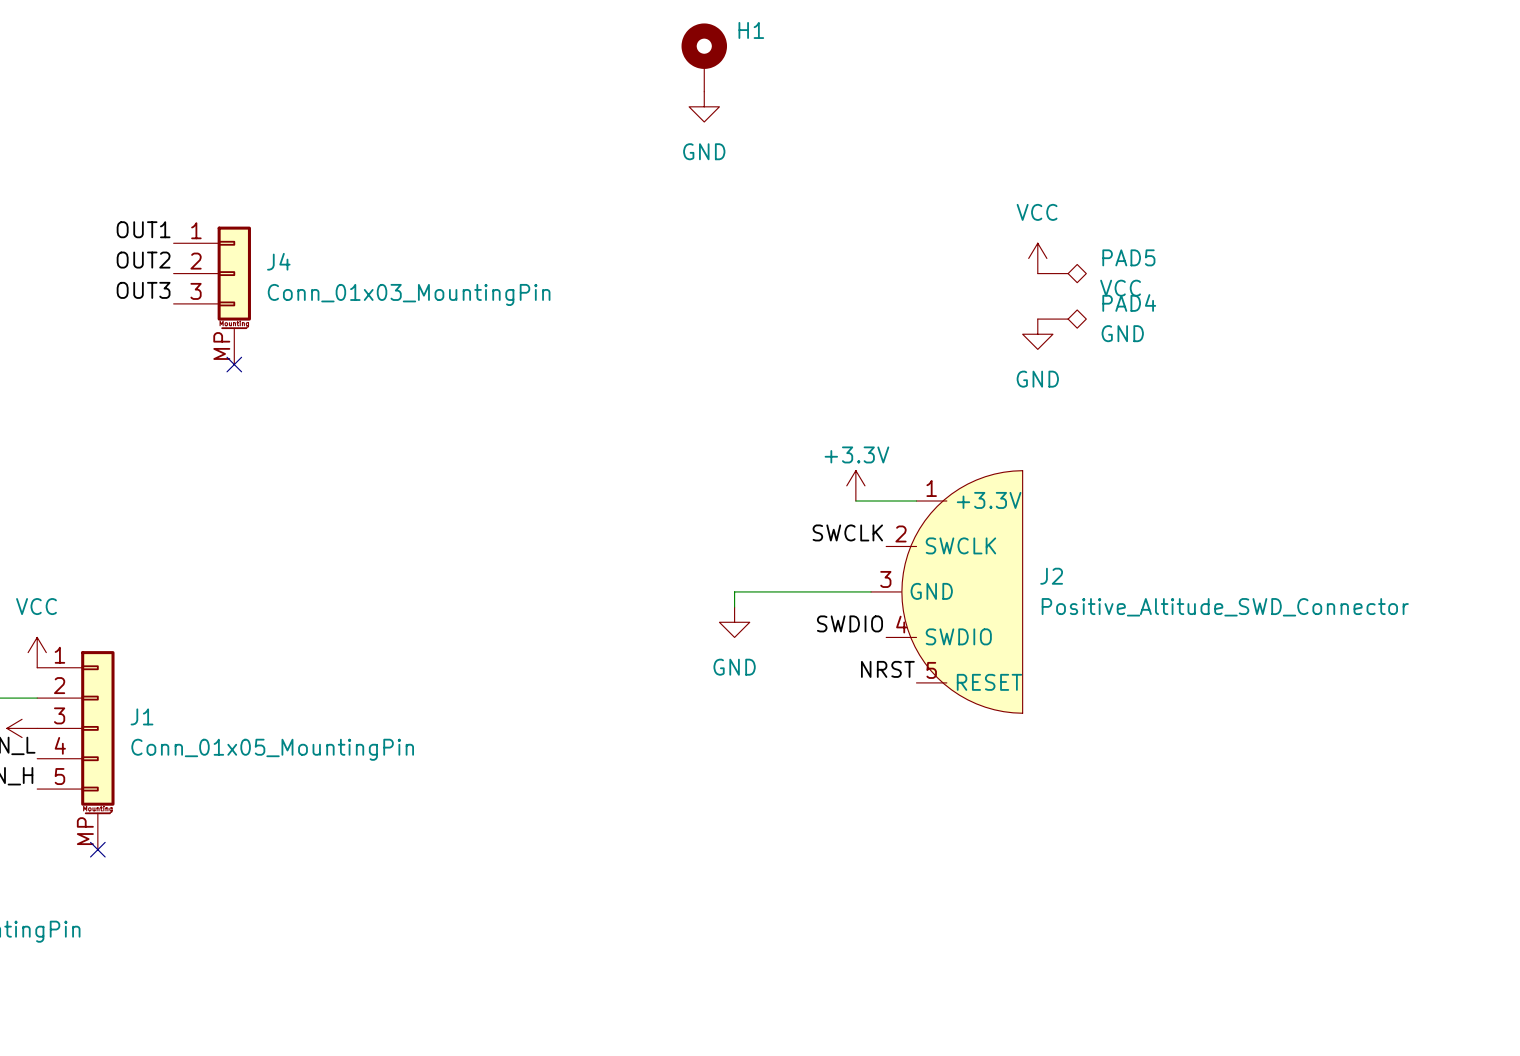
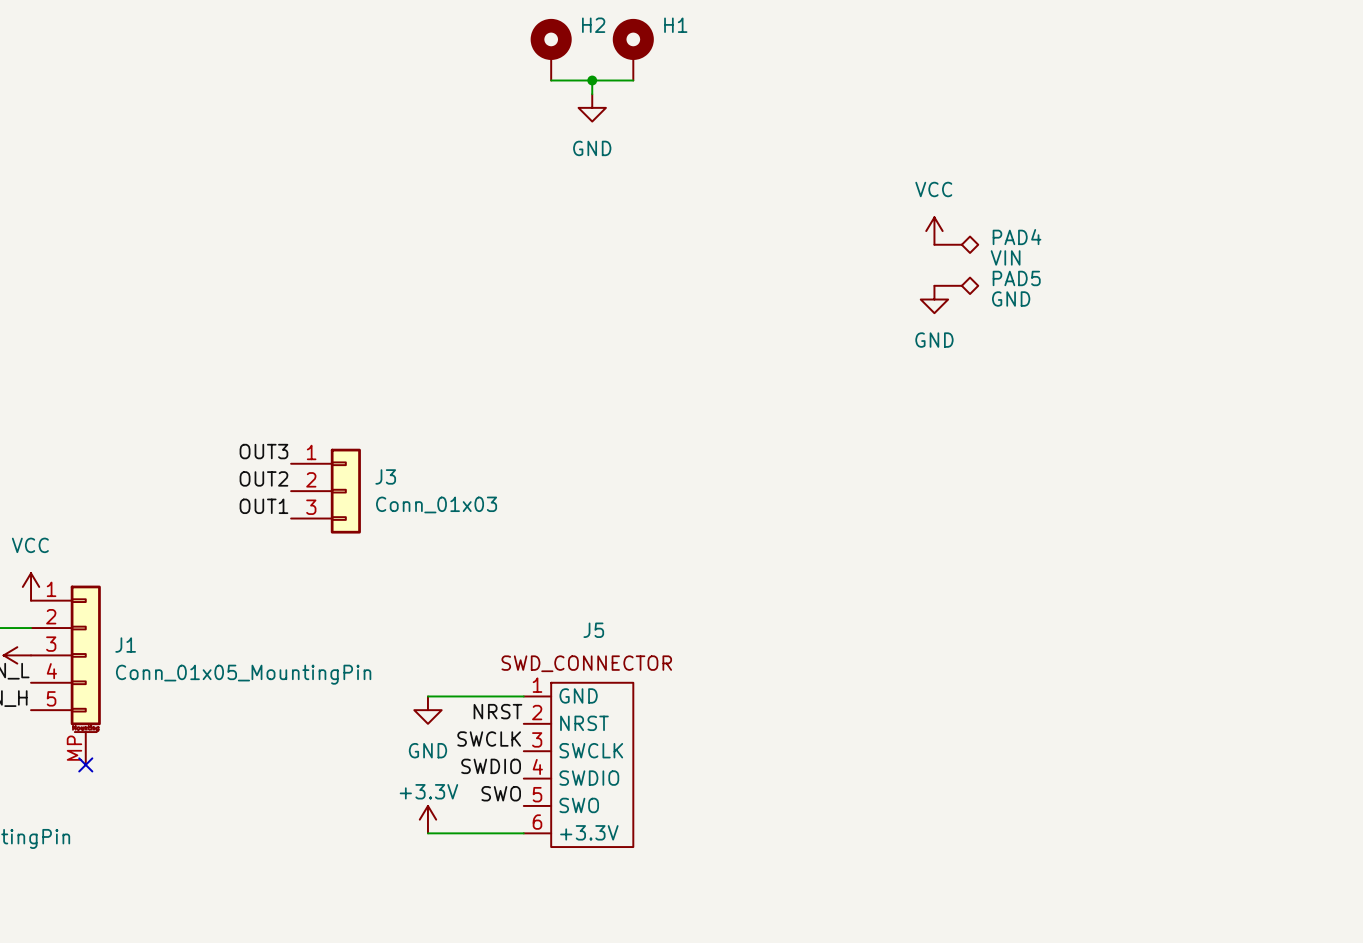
H2: none -> (551, 49)
wire: none -> (551, 80) (633, 80)
wire: none -> (592, 80) (592, 94)
junction: none -> (592, 80)
power symbol position: GND (704, 106) -> GND (592, 107)
label: OUT1 (143, 229) -> none
PAD5 name: PAD5 (1128, 257) -> PAD4 (1017, 237)
label: OUT2 (143, 260) -> none
PAD5 value: VCC (1120, 288) -> VIN (1005, 257)
label position: OUT3 (143, 290) -> OUT3 (263, 451)
J4: Conn_01x03_MountingPin (212, 295) -> none
PAD4 name: PAD4 (1129, 302) -> PAD5 (1016, 278)
no-connect mark: (234, 364) -> none
power symbol: +3.3V (855, 485) -> none
wire: (855, 501) (916, 501) -> none
label: none -> OUT2 (263, 478)
label: SWCLK (847, 532) -> none
J3: none -> Conn_01x03 (326, 491)
label: none -> OUT1 (263, 506)
wire: (871, 591) (734, 591) (734, 607) -> none
J2: Positive_Altitude_SWD_Connector (946, 591) -> none
power symbol: GND (734, 622) -> none
label: SWDIO (849, 623) -> none
label: NRST (887, 669) -> none
wire: none -> (427, 696) (523, 696)
power symbol: none -> GND (427, 710)
label: none -> NRST (497, 711)
label: none -> SWCLK (489, 739)
J5: none -> (578, 764)
label: none -> SWDIO (491, 766)
label: none -> SWO (501, 793)
power symbol: none -> +3.3V (427, 819)
wire: none -> (427, 833) (523, 833)

